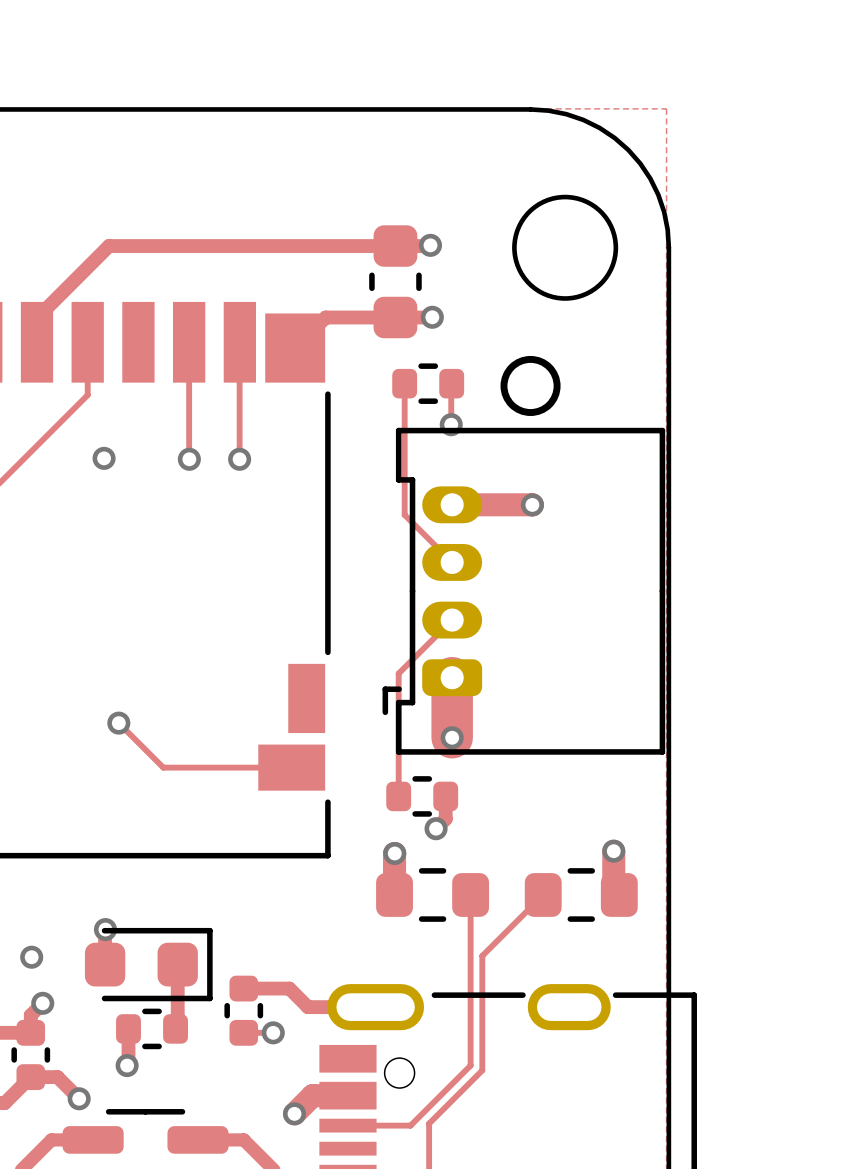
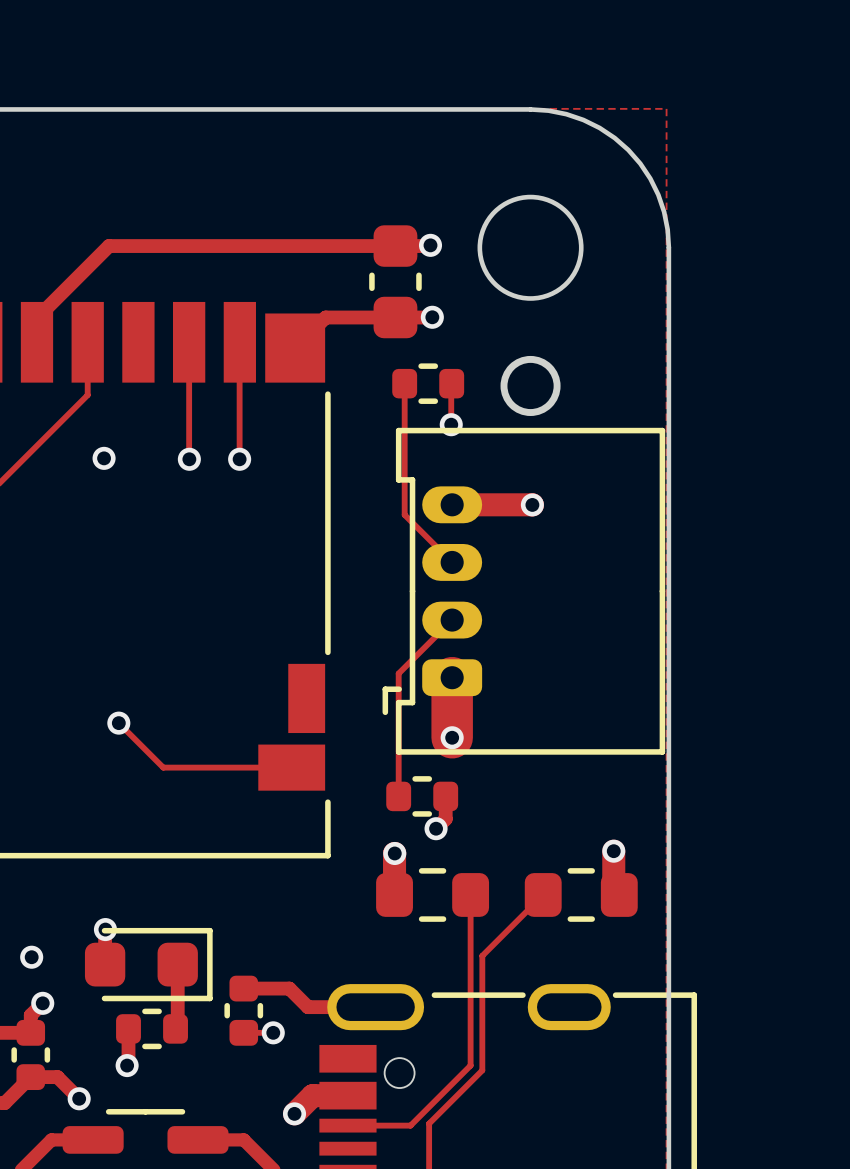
round board edge position: (565, 247) -> (530, 247)

